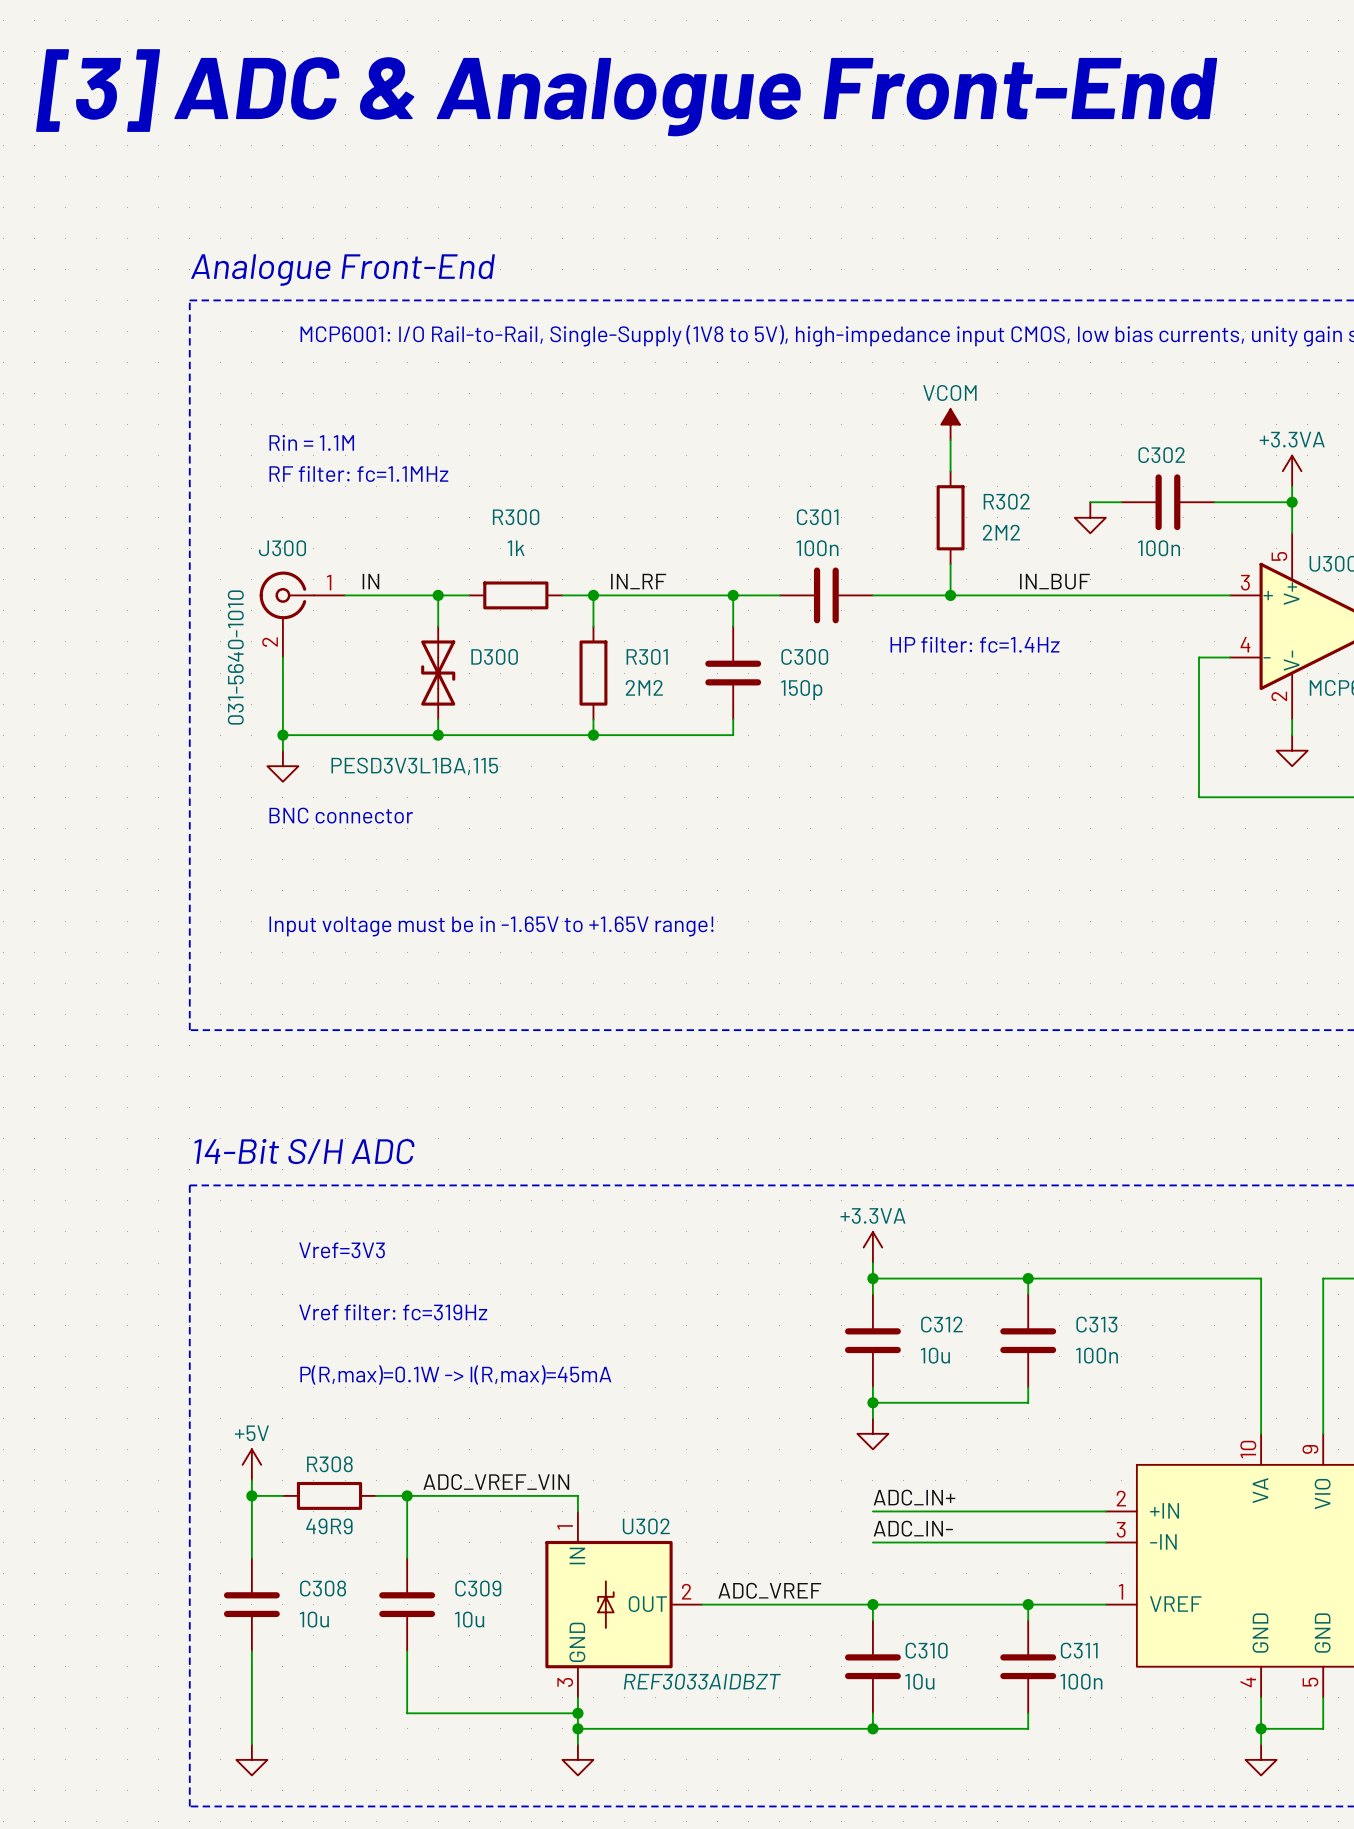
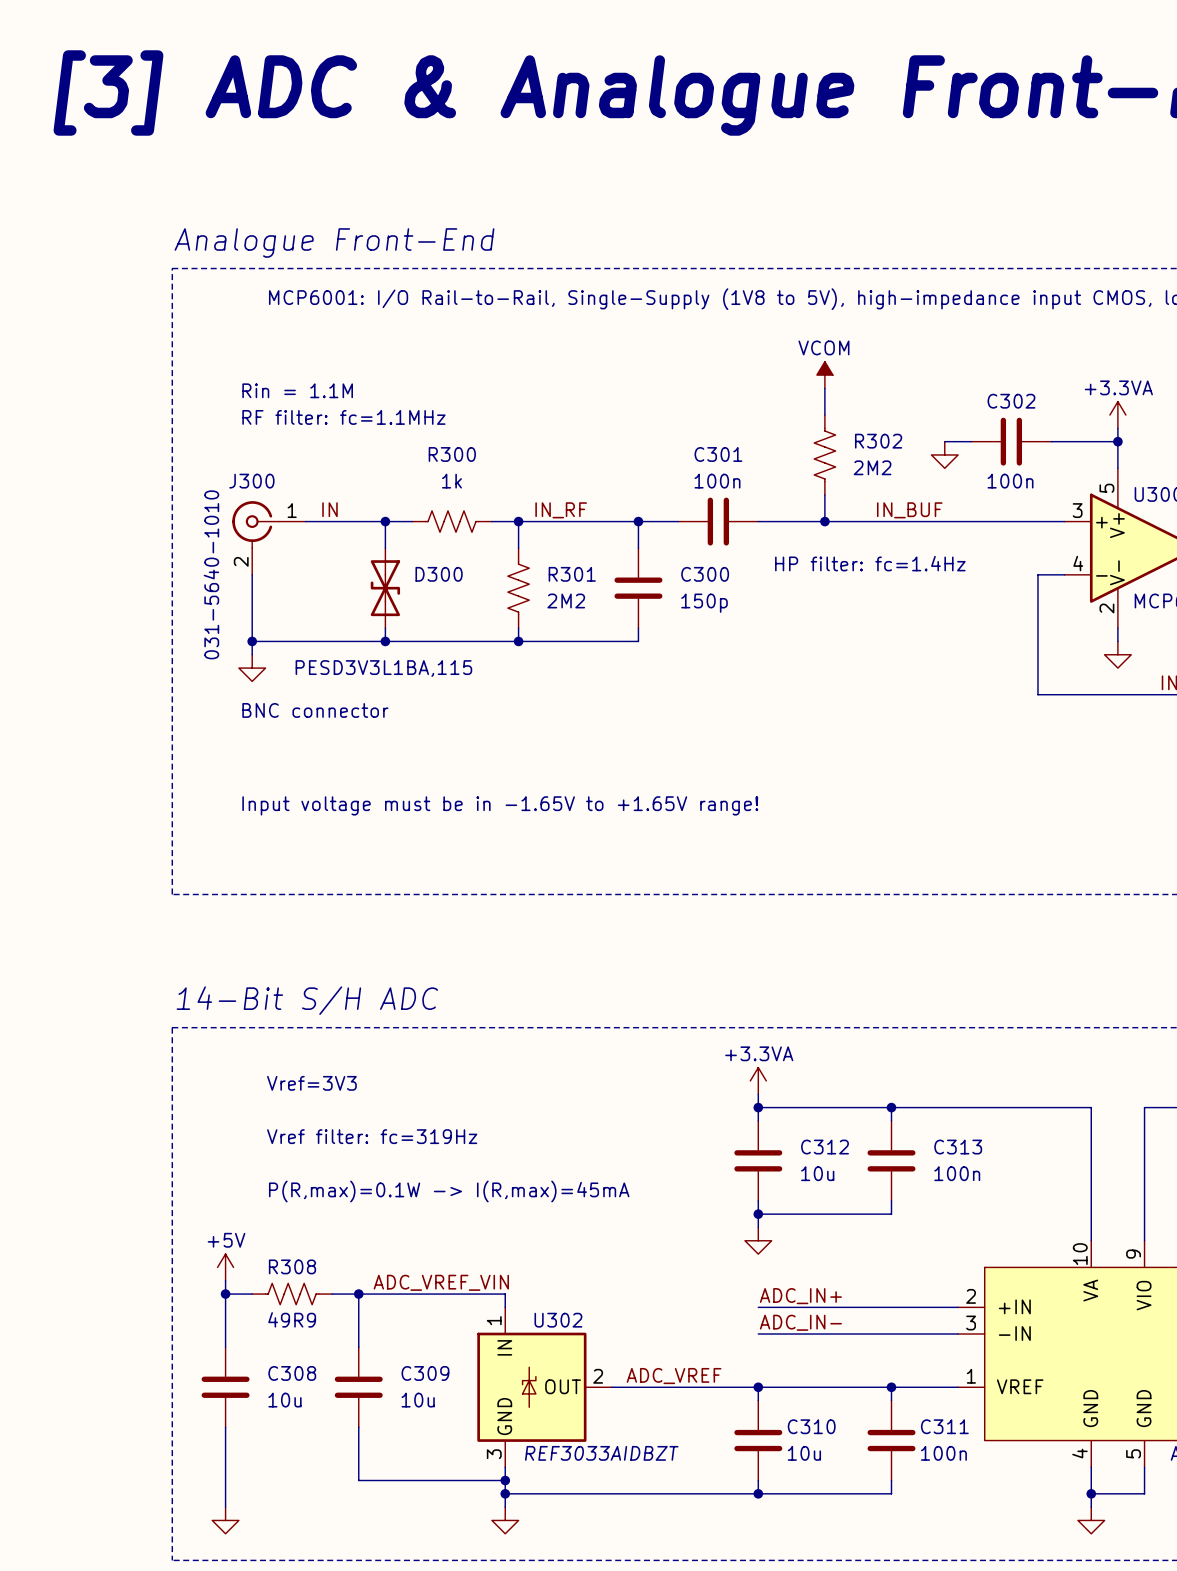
R302 symbol: [936, 471, 965, 565] -> [814, 415, 836, 495]
R300 symbol: [469, 581, 563, 610] -> [412, 510, 492, 533]
R301 symbol: [579, 626, 608, 720] -> [507, 548, 530, 629]
R308 symbol: [282, 1481, 377, 1510] -> [252, 1283, 333, 1305]

